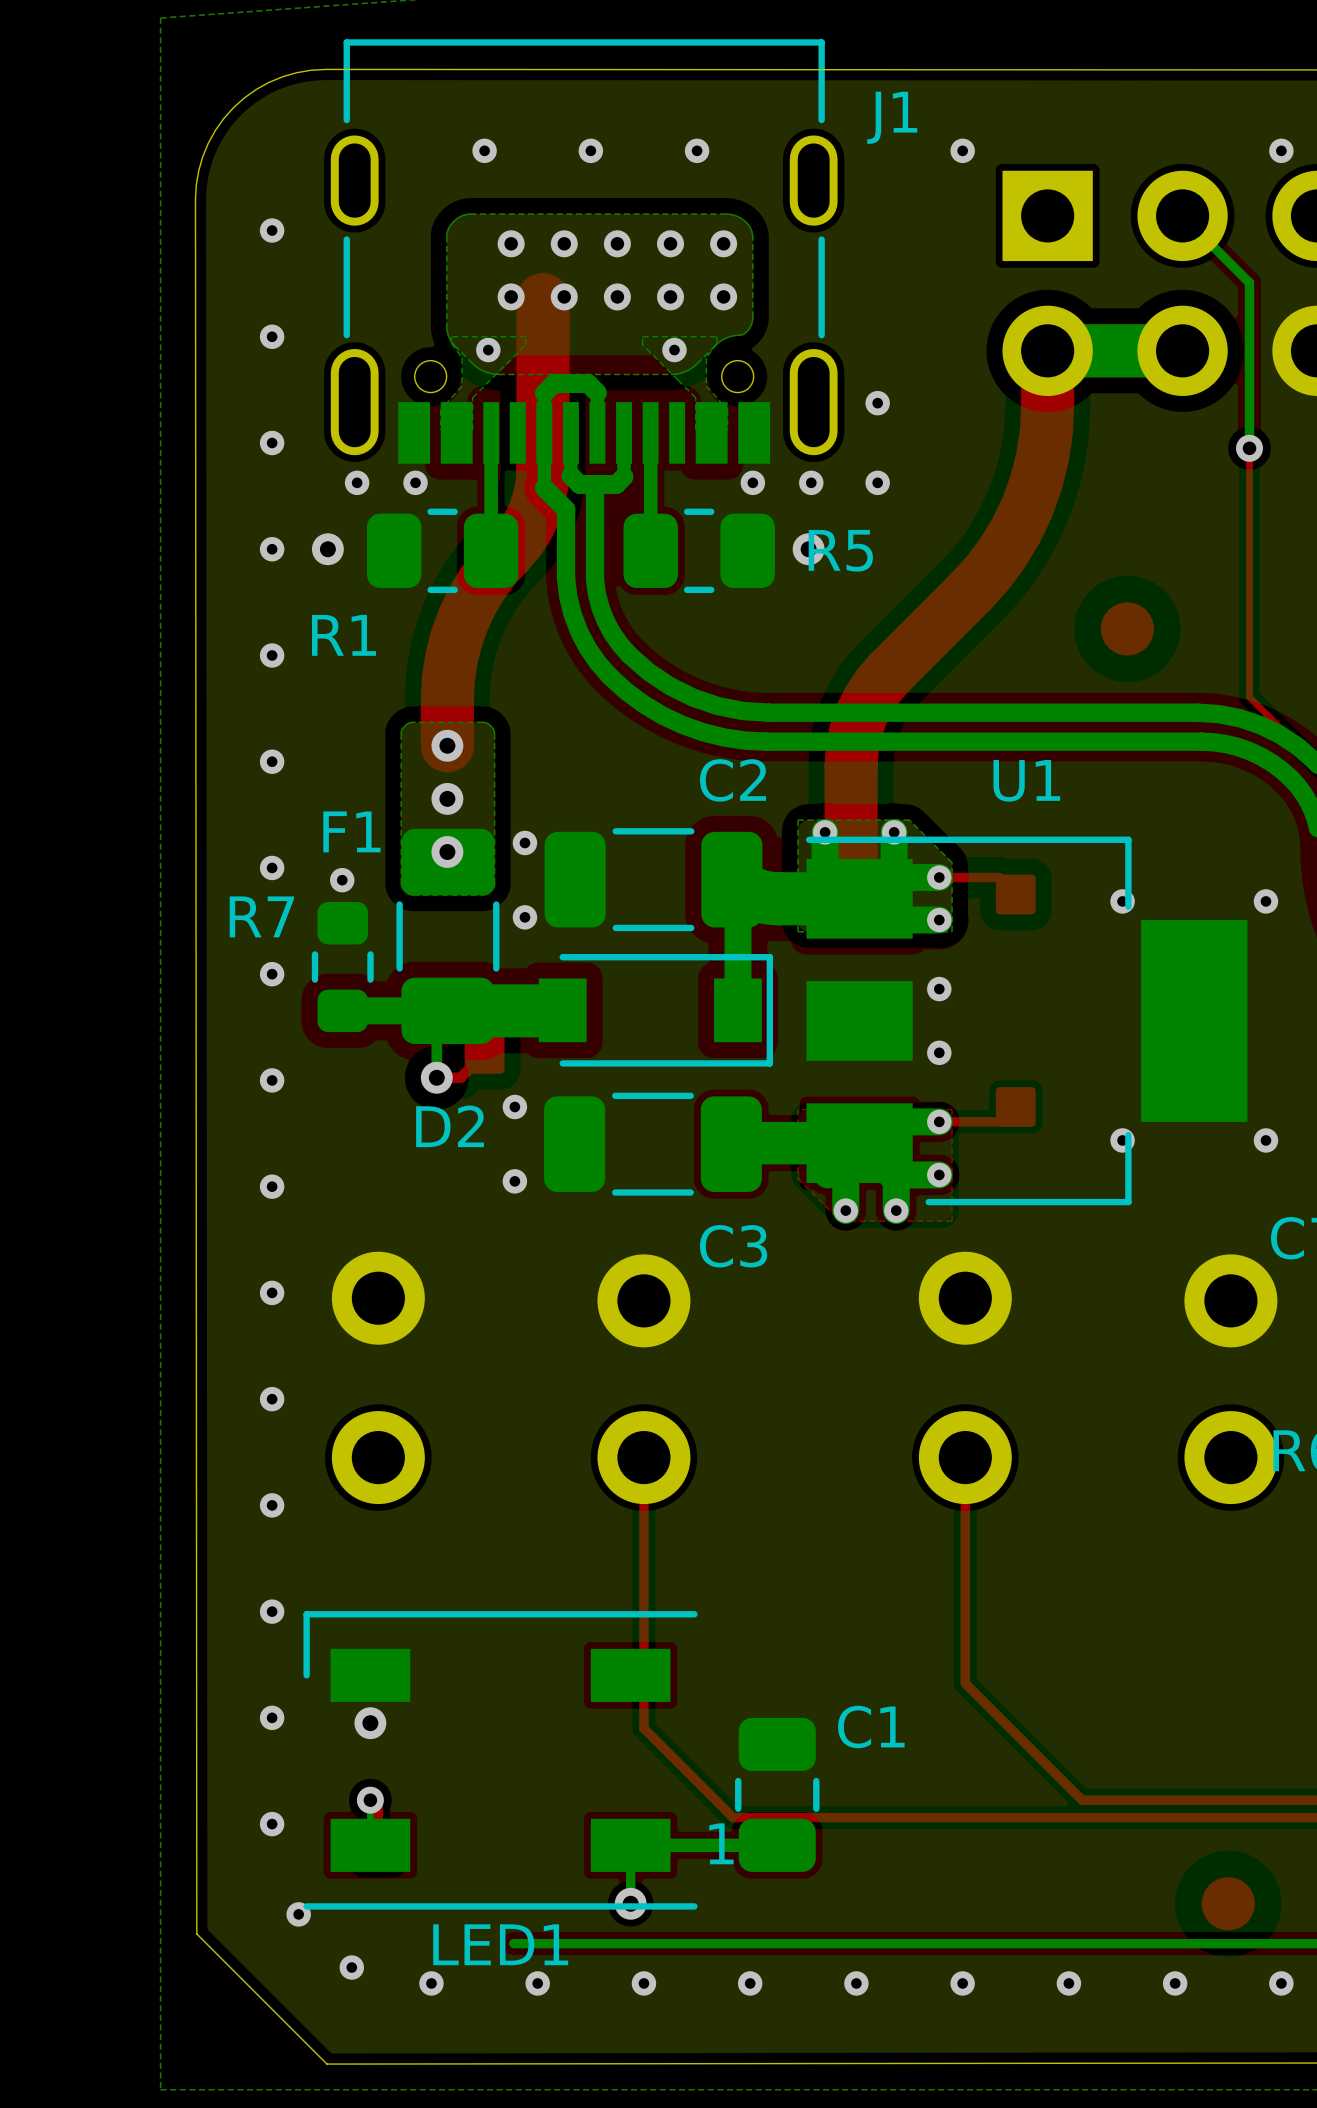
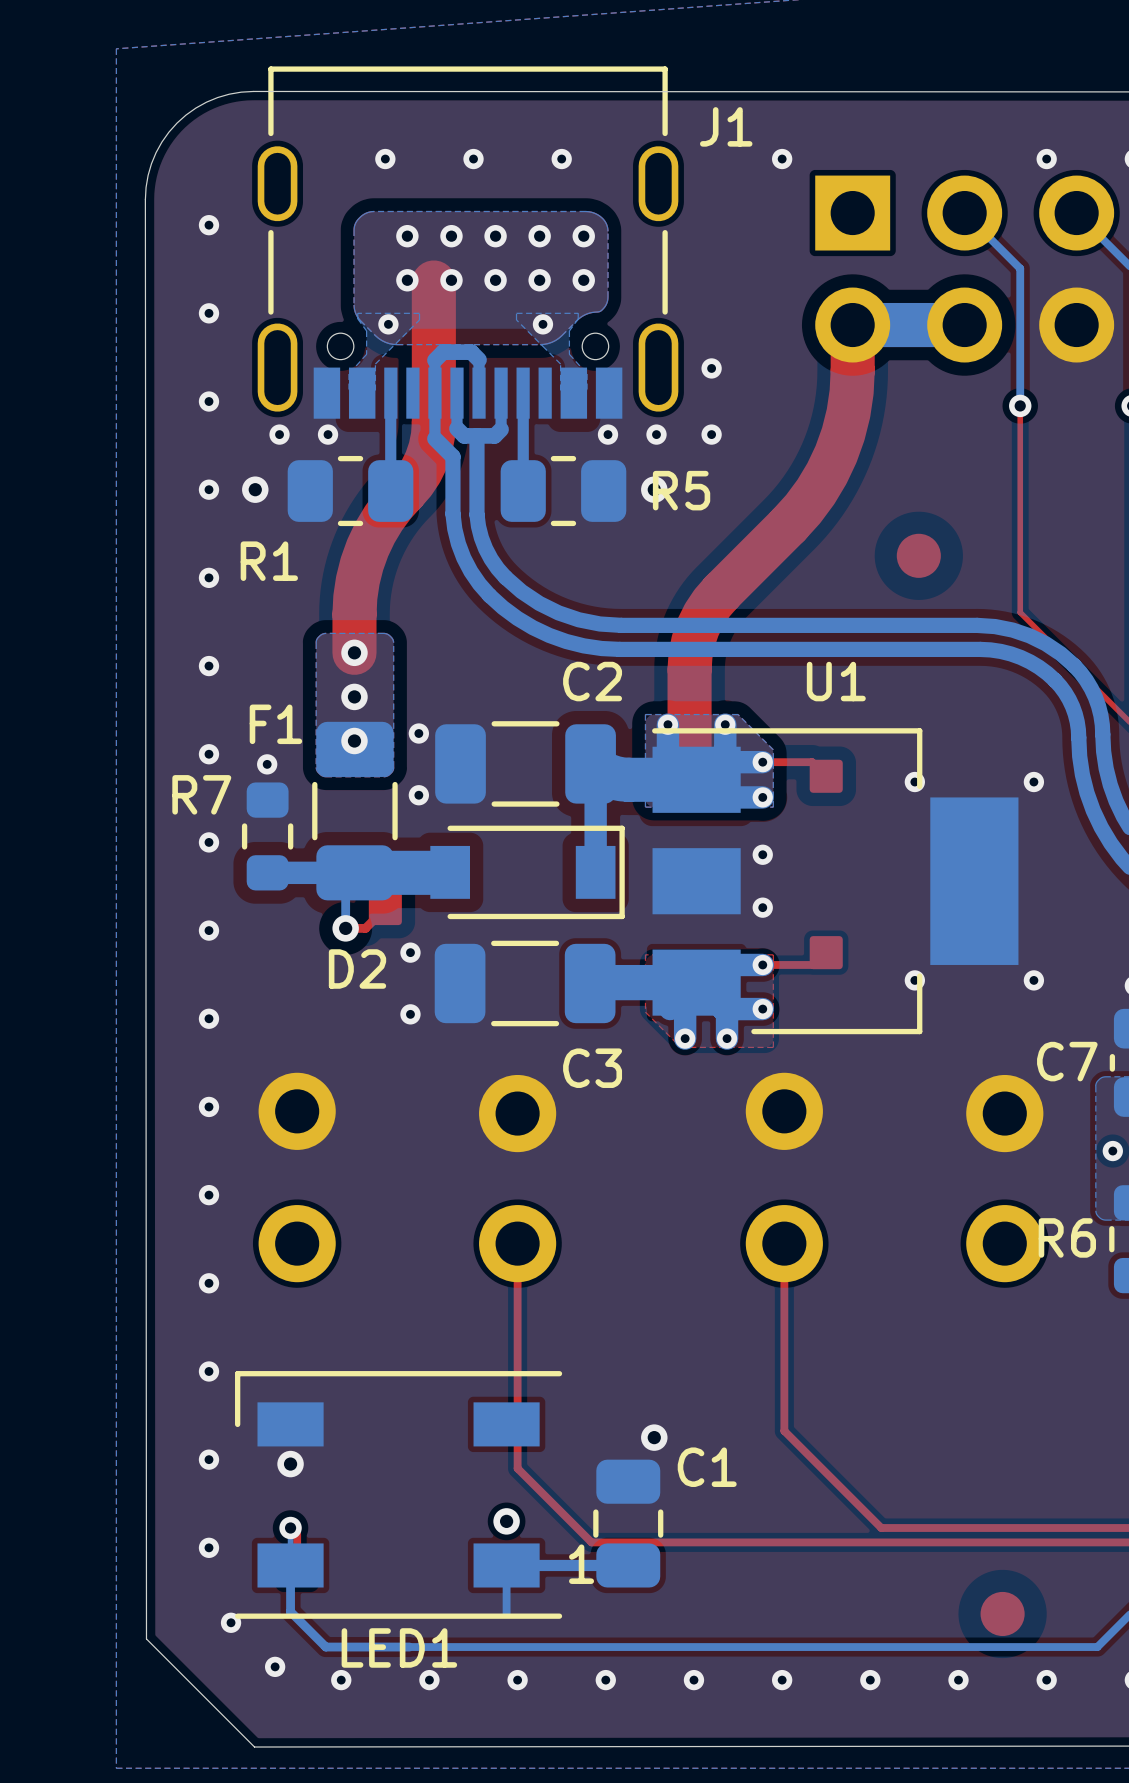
via: none -> (654, 1437)
bottom track: none -> (290, 1565) (290, 1611) (325, 1647) (409, 1647)
via position: (630, 1903) -> (506, 1521)

